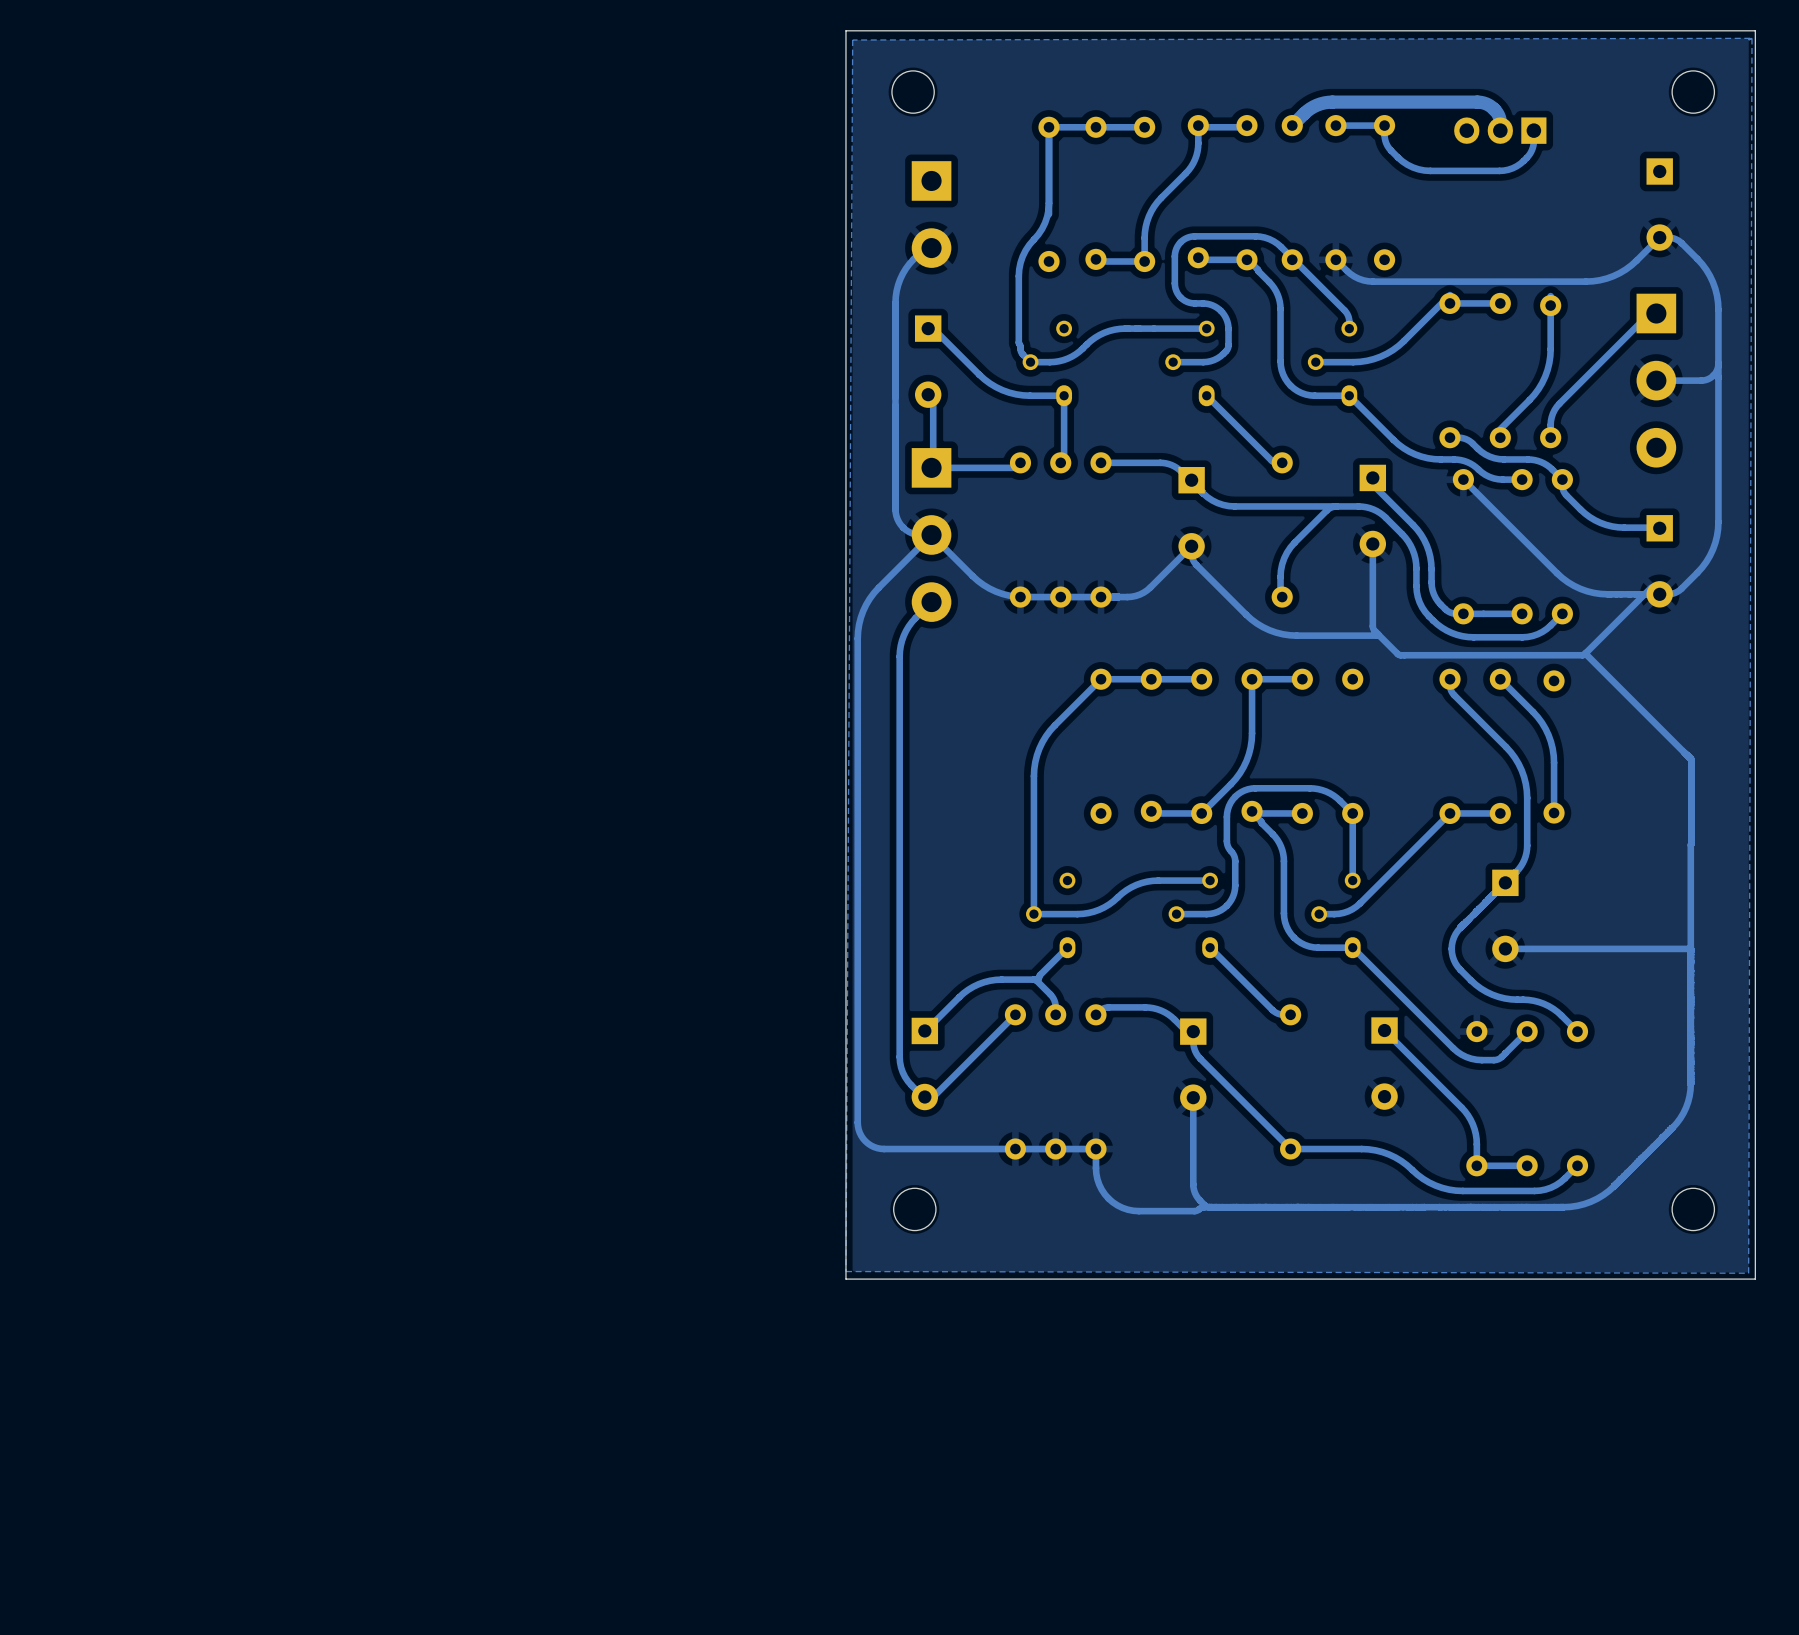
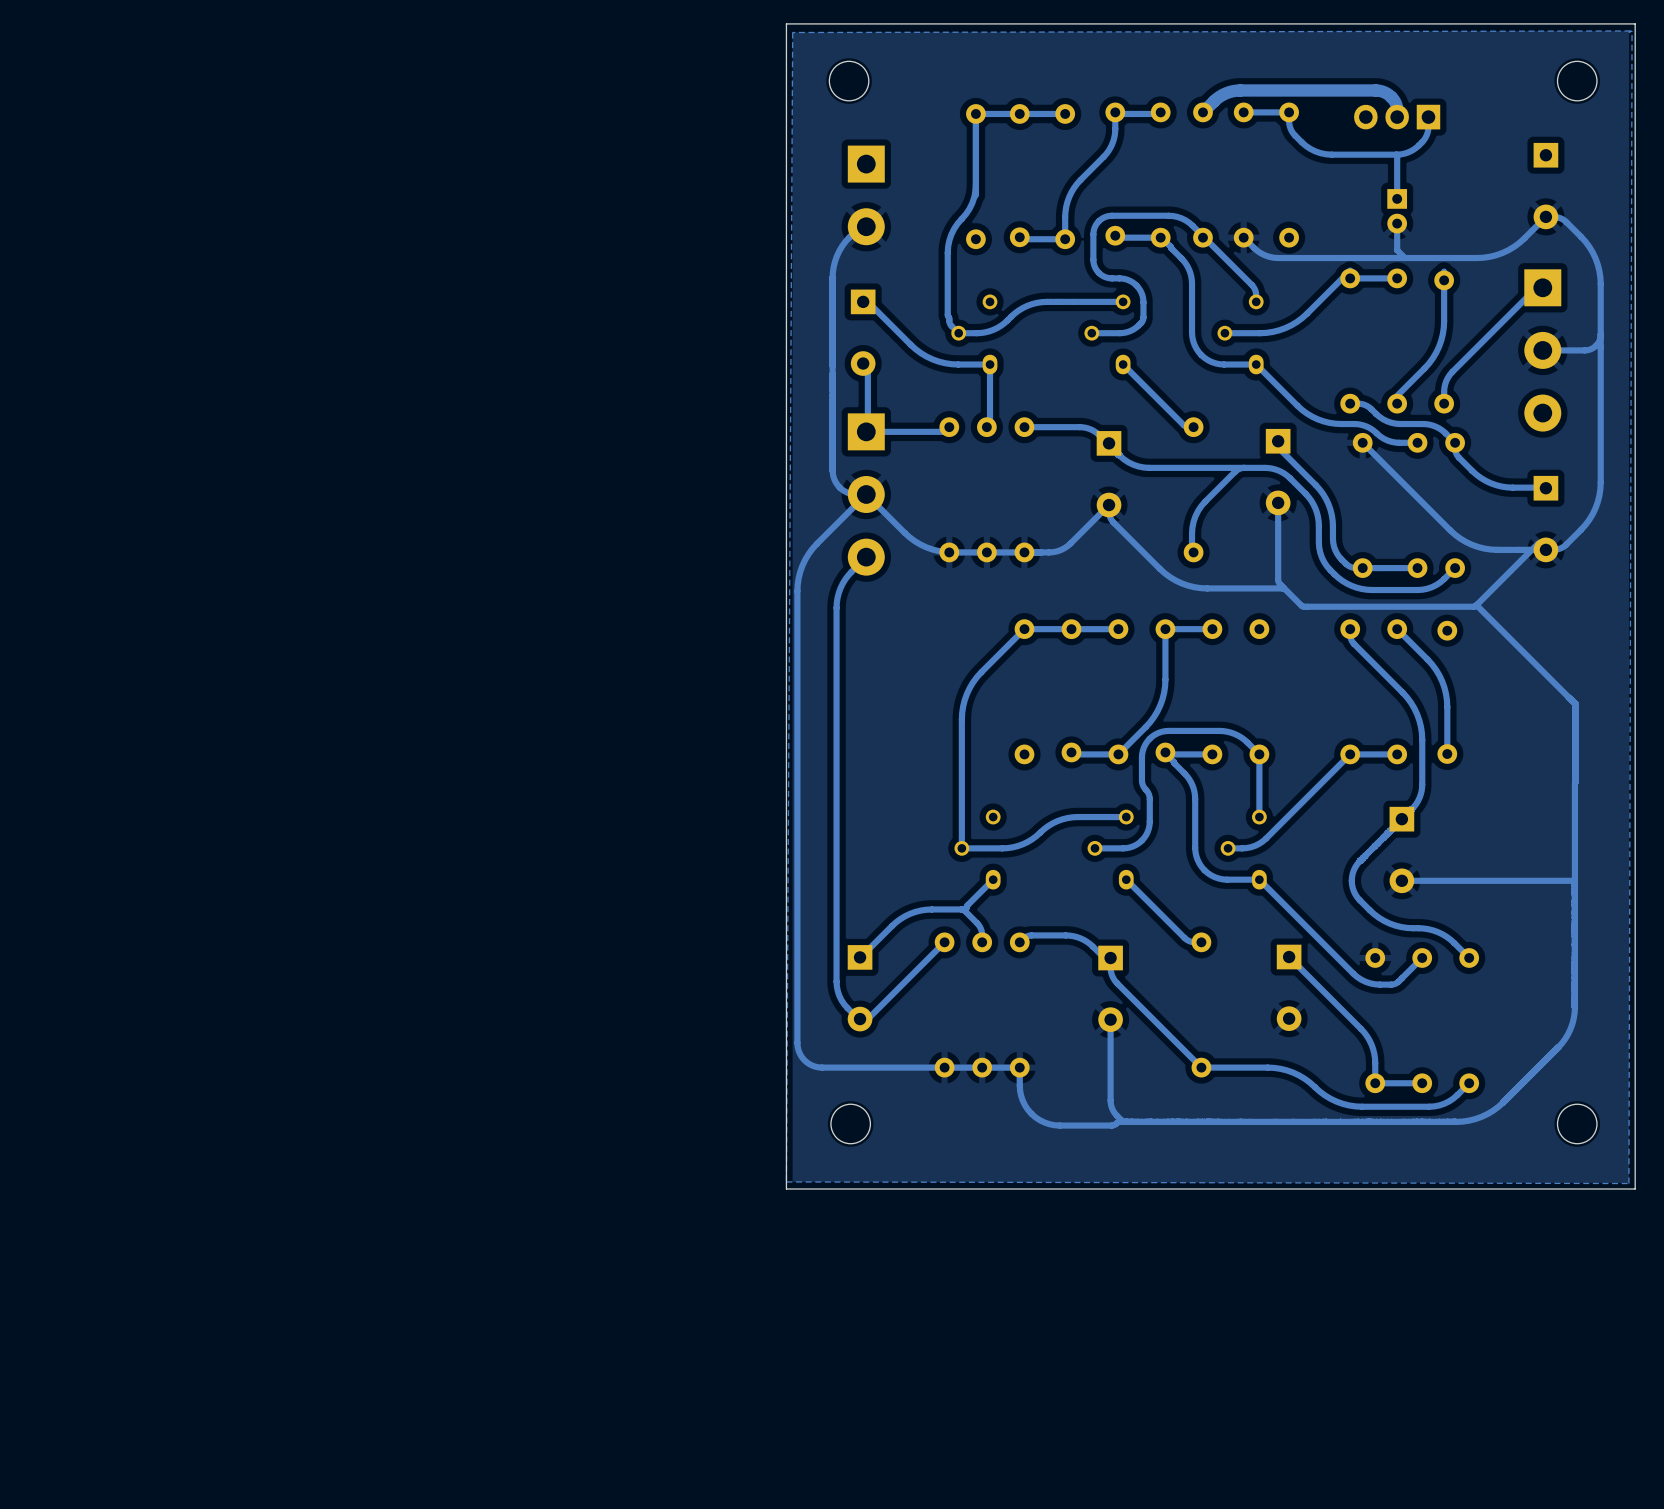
track: none -> (1396, 154) (1397, 198)
part: none -> (1397, 211)
track: none -> (1397, 223) (1397, 250) (1404, 258)

